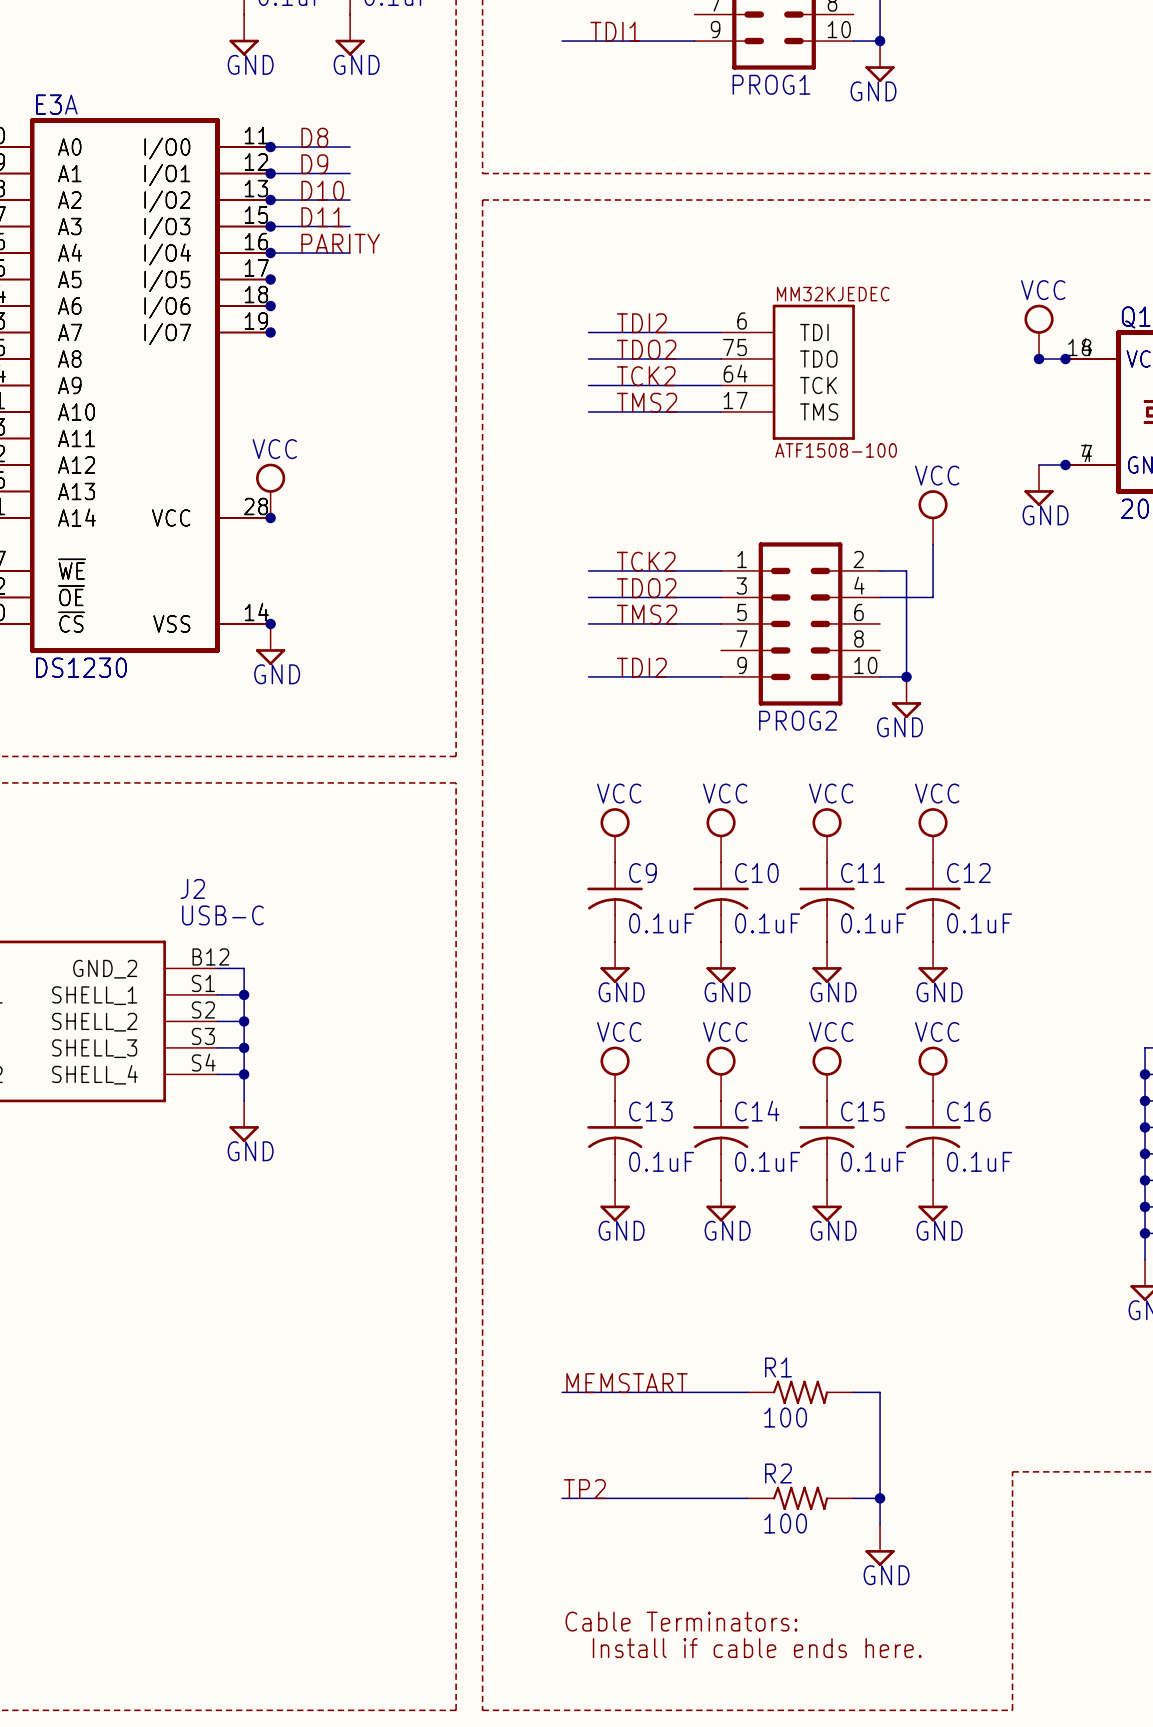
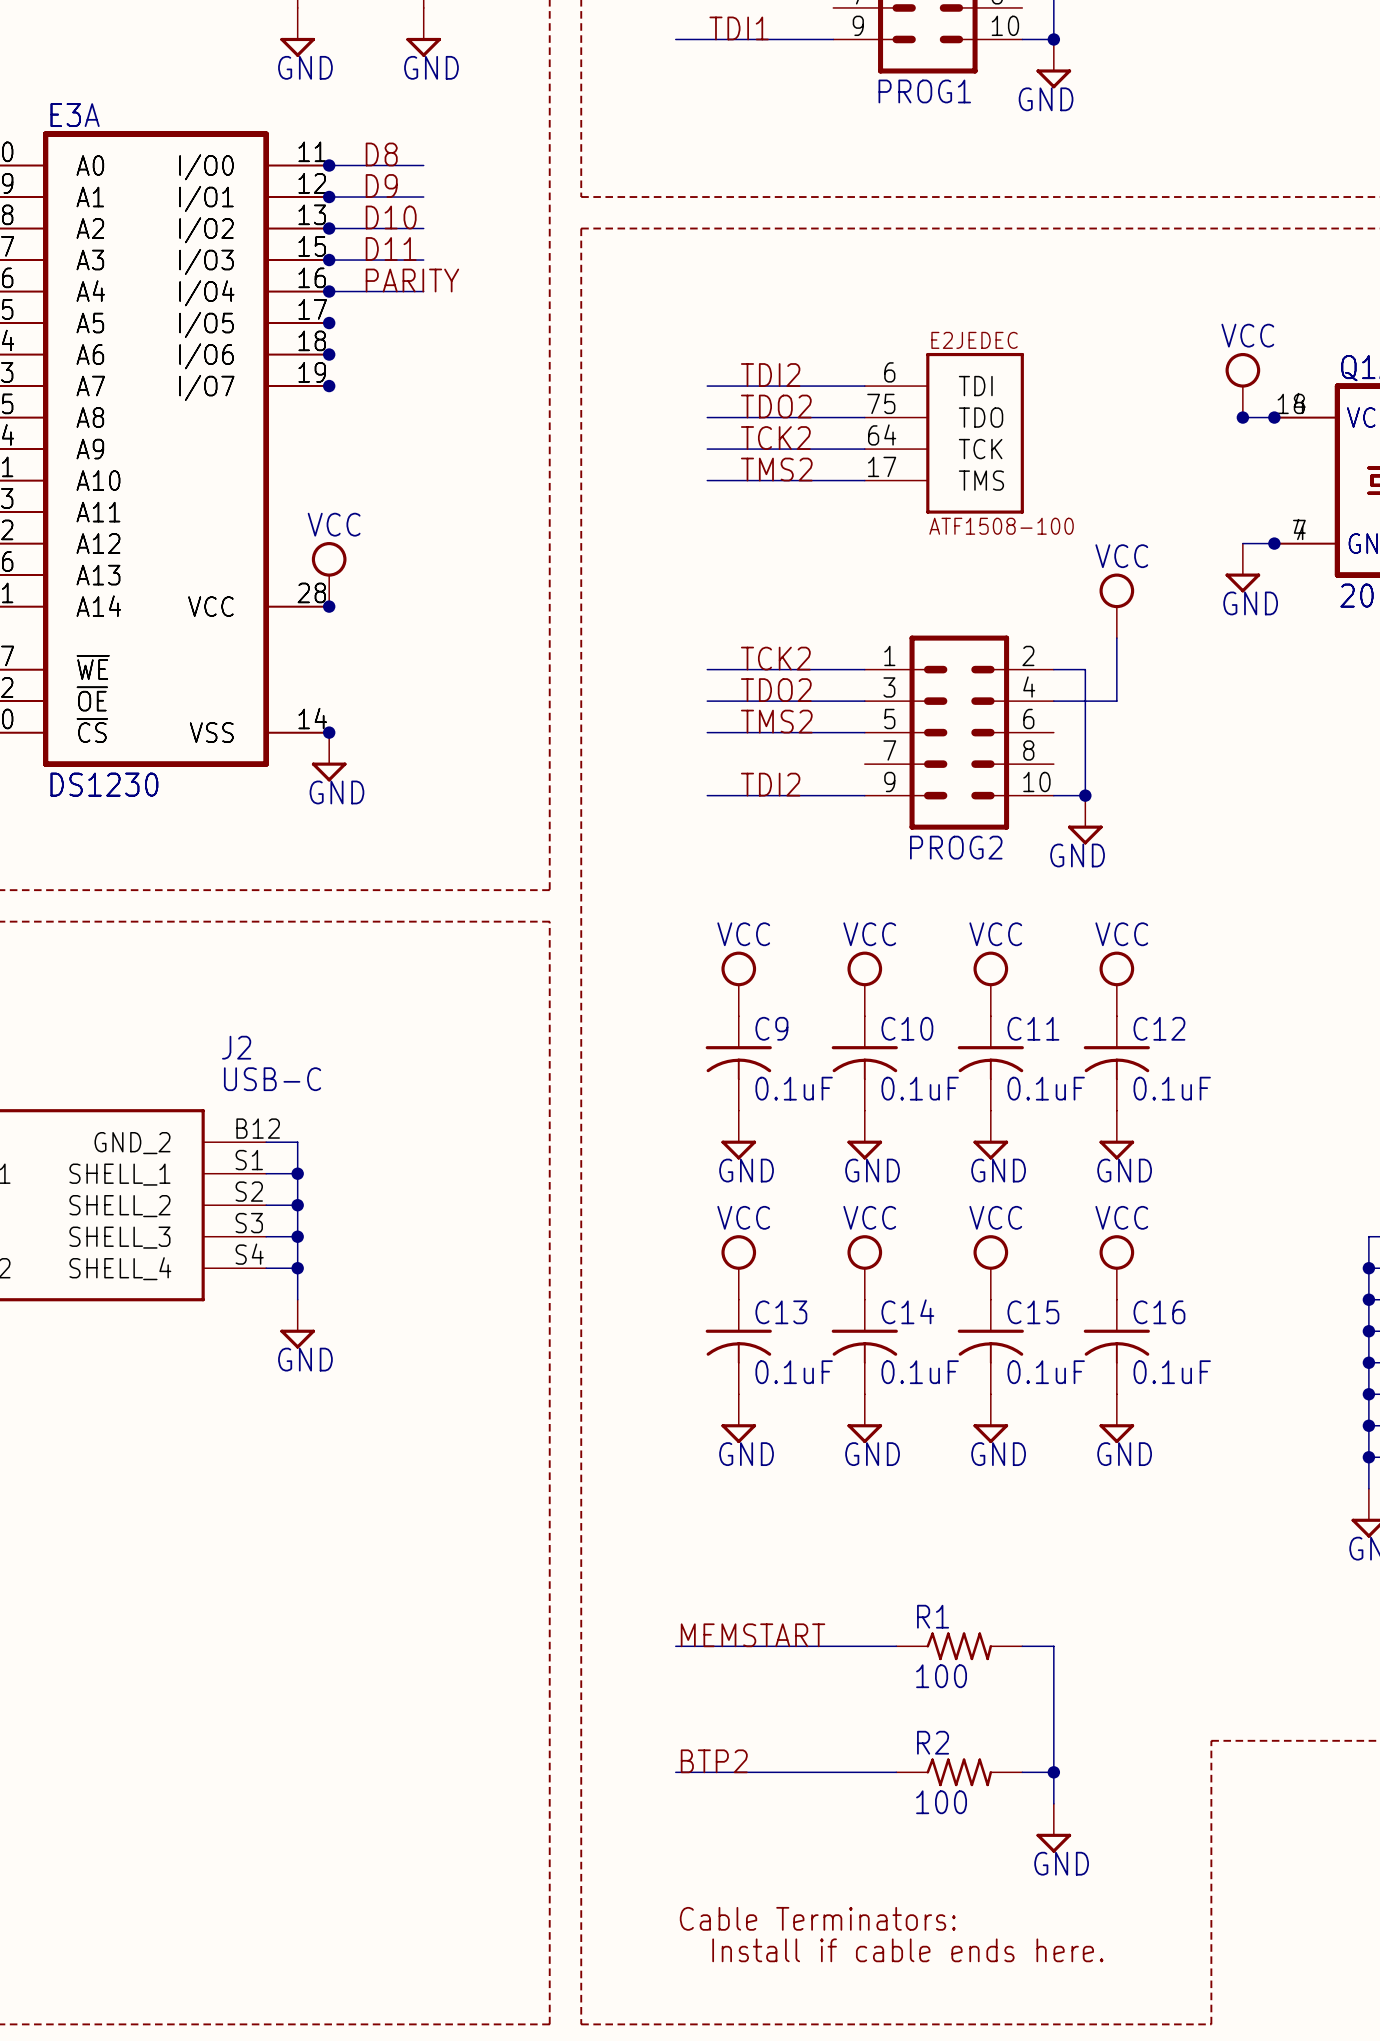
MM32KJEDEC name: MM32KJEDEC (833, 294) -> E2JEDEC (974, 340)
label: TP2 (584, 1489) -> BTP2 (714, 1761)

